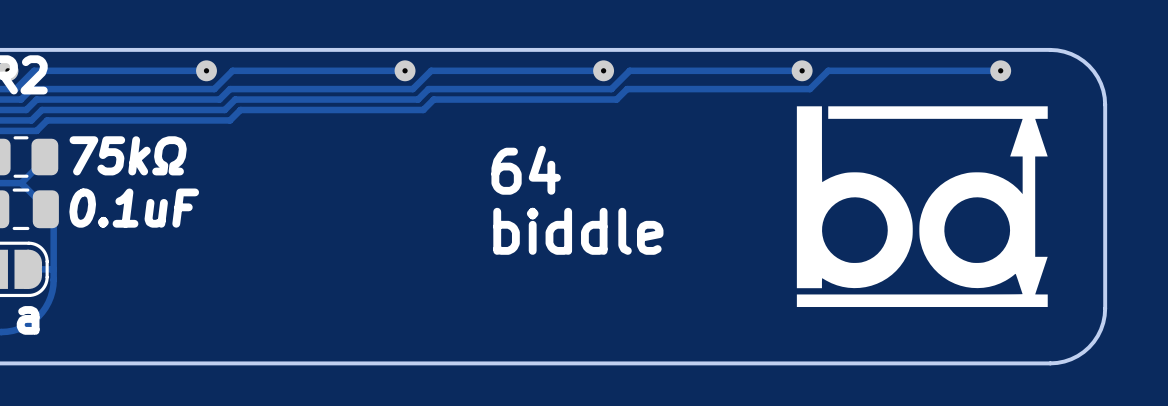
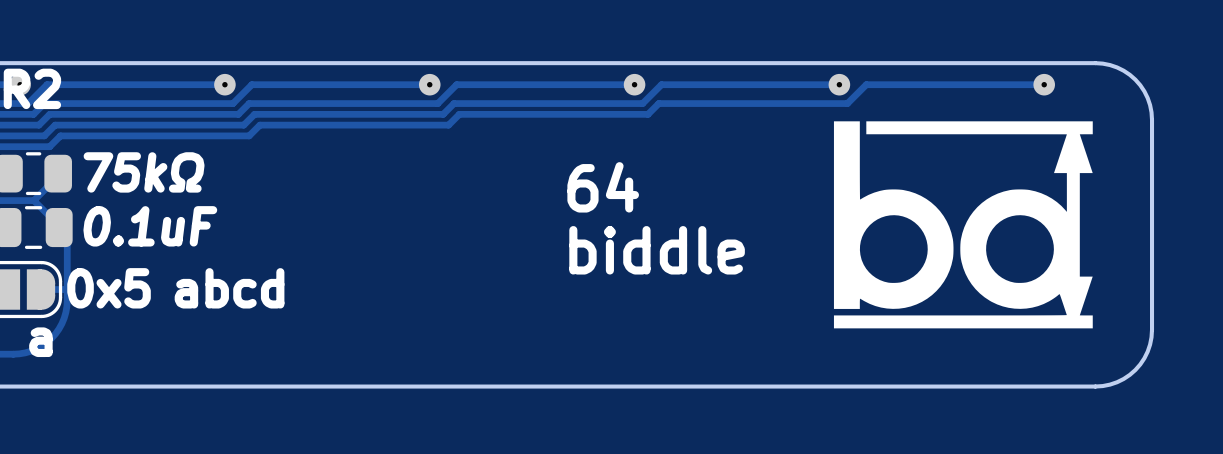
text position: 64 (526, 170) -> 64 (603, 187)
text position: biddle (578, 231) -> biddle (657, 250)
text: none -> 0x5 (109, 288)
text: none -> abcd (229, 288)

